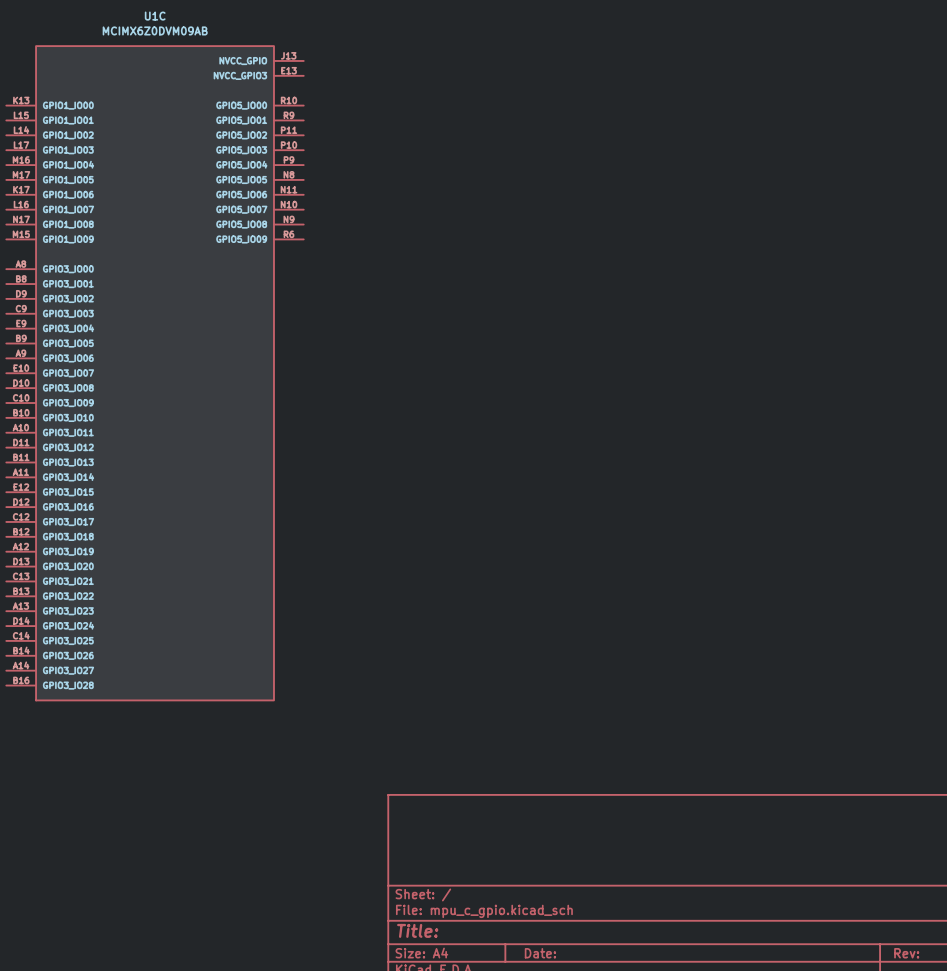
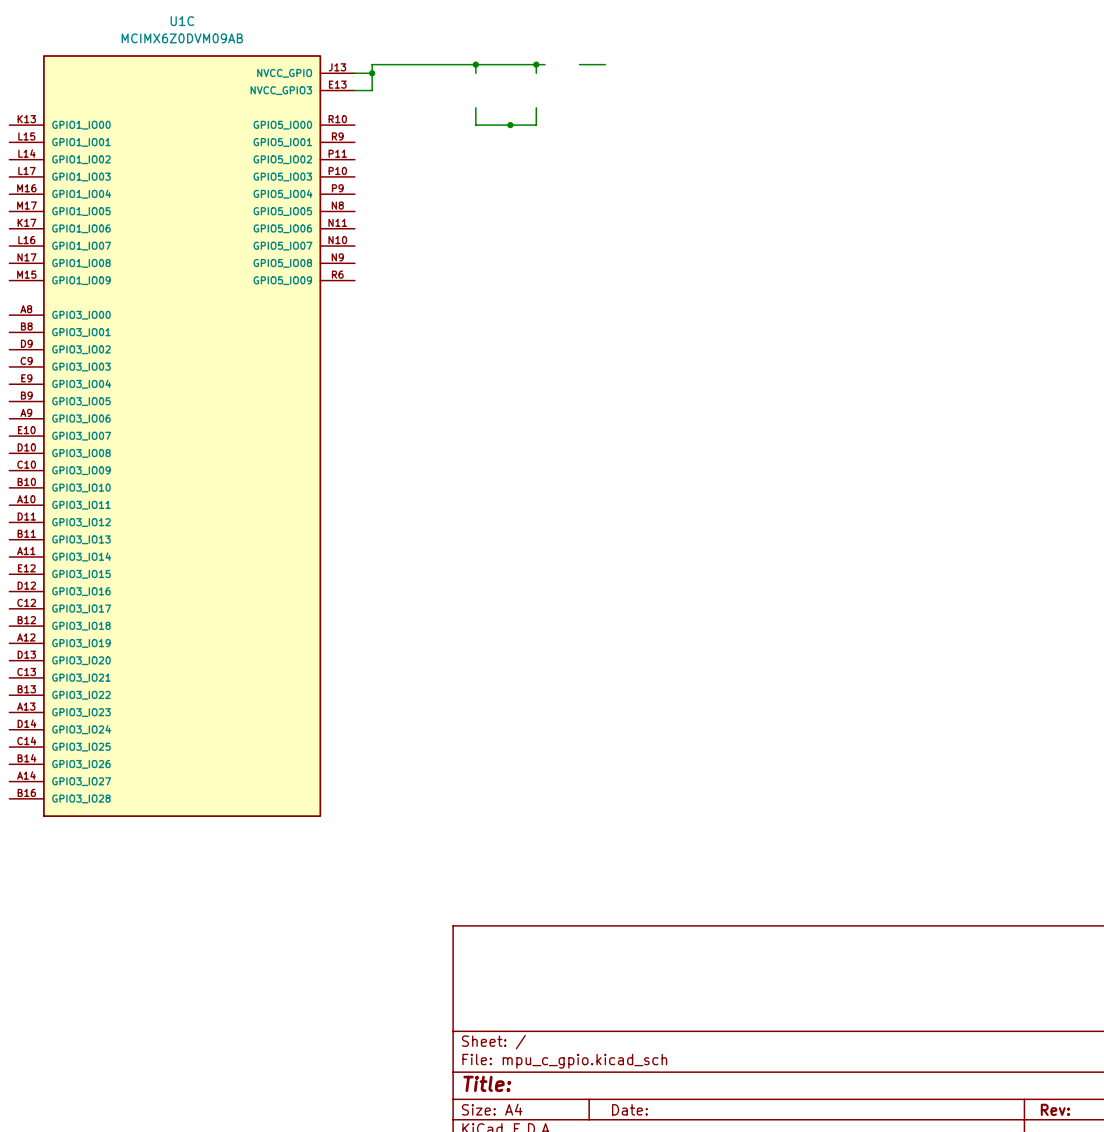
wire: none -> (475, 64) (475, 73)
junction: none -> (475, 64)
wire: none -> (536, 64) (536, 73)
junction: none -> (536, 64)
wire: none -> (544, 64) (372, 64) (372, 90) (354, 90)
wire: none -> (579, 64) (605, 64)
wire: none -> (354, 73) (372, 73)
junction: none -> (372, 73)
wire: none -> (475, 107) (475, 125) (536, 125) (536, 107)
junction: none -> (510, 125)

